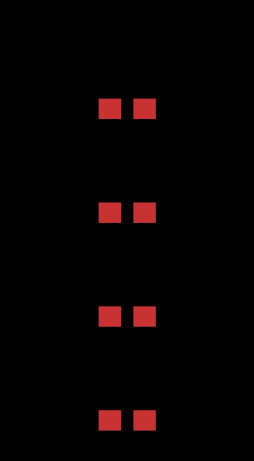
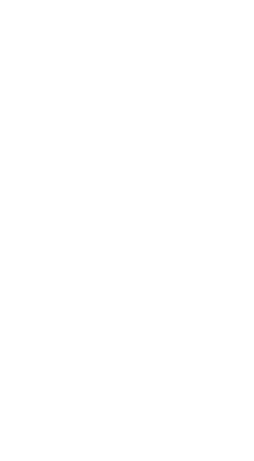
part: (127, 108) -> none
part: (127, 212) -> none
part: (127, 316) -> none
part: (127, 420) -> none

